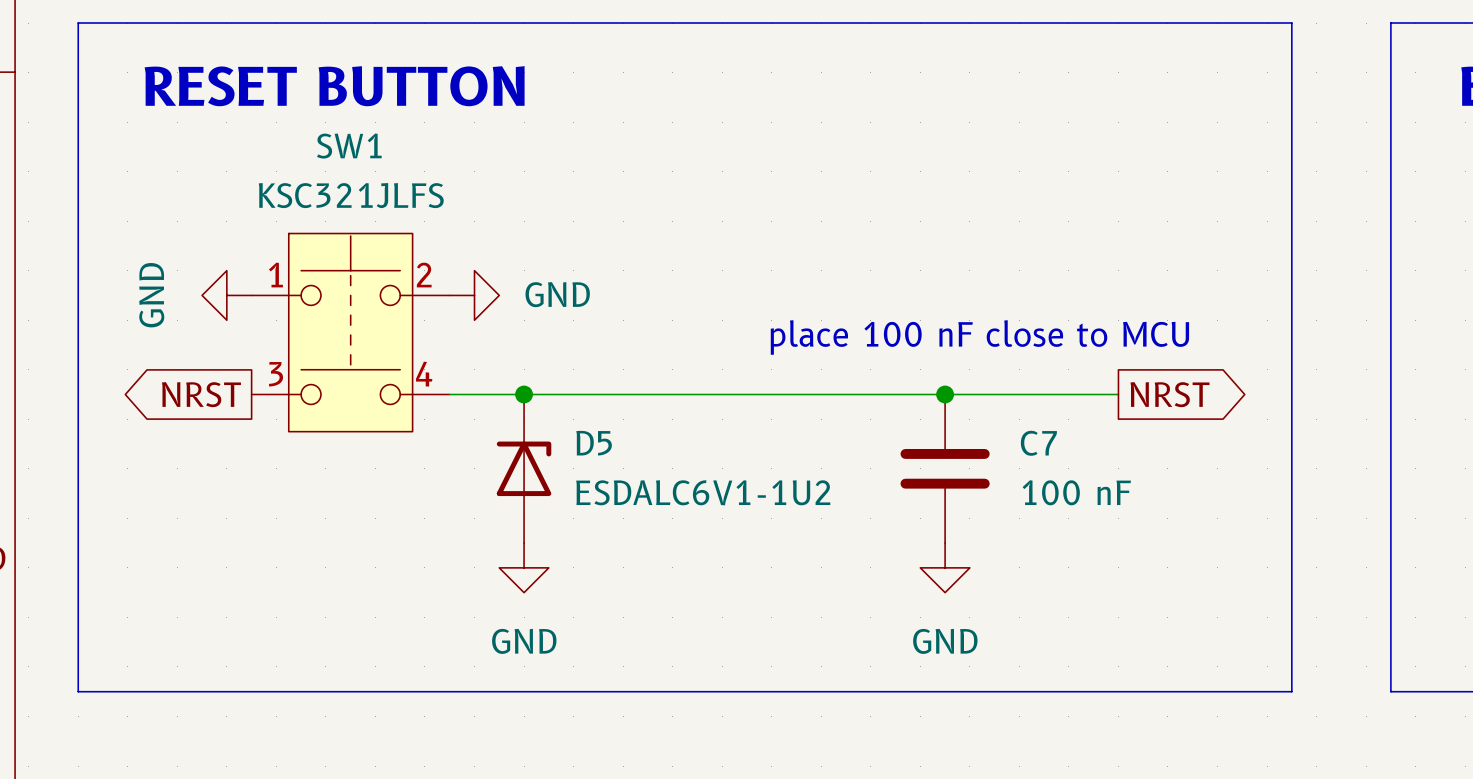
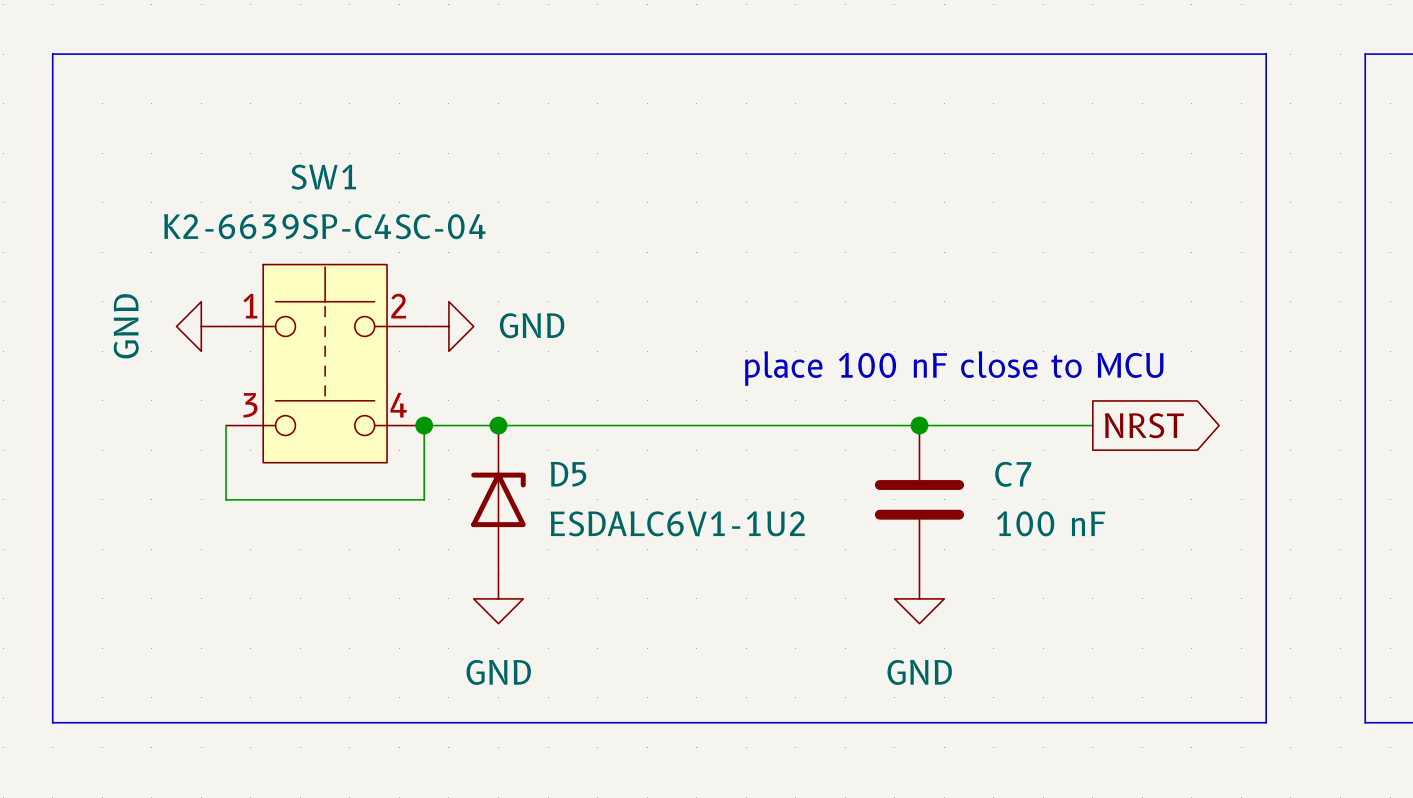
text: RESET BUTTON (334, 86) -> none
SW1 value: KSC321JLFS (351, 195) -> K2-6639SP-C4SC-04 (324, 226)
global label: NRST (201, 394) -> none
wire: none -> (226, 425) (226, 499) (424, 499) (424, 425)
junction: none -> (424, 425)

